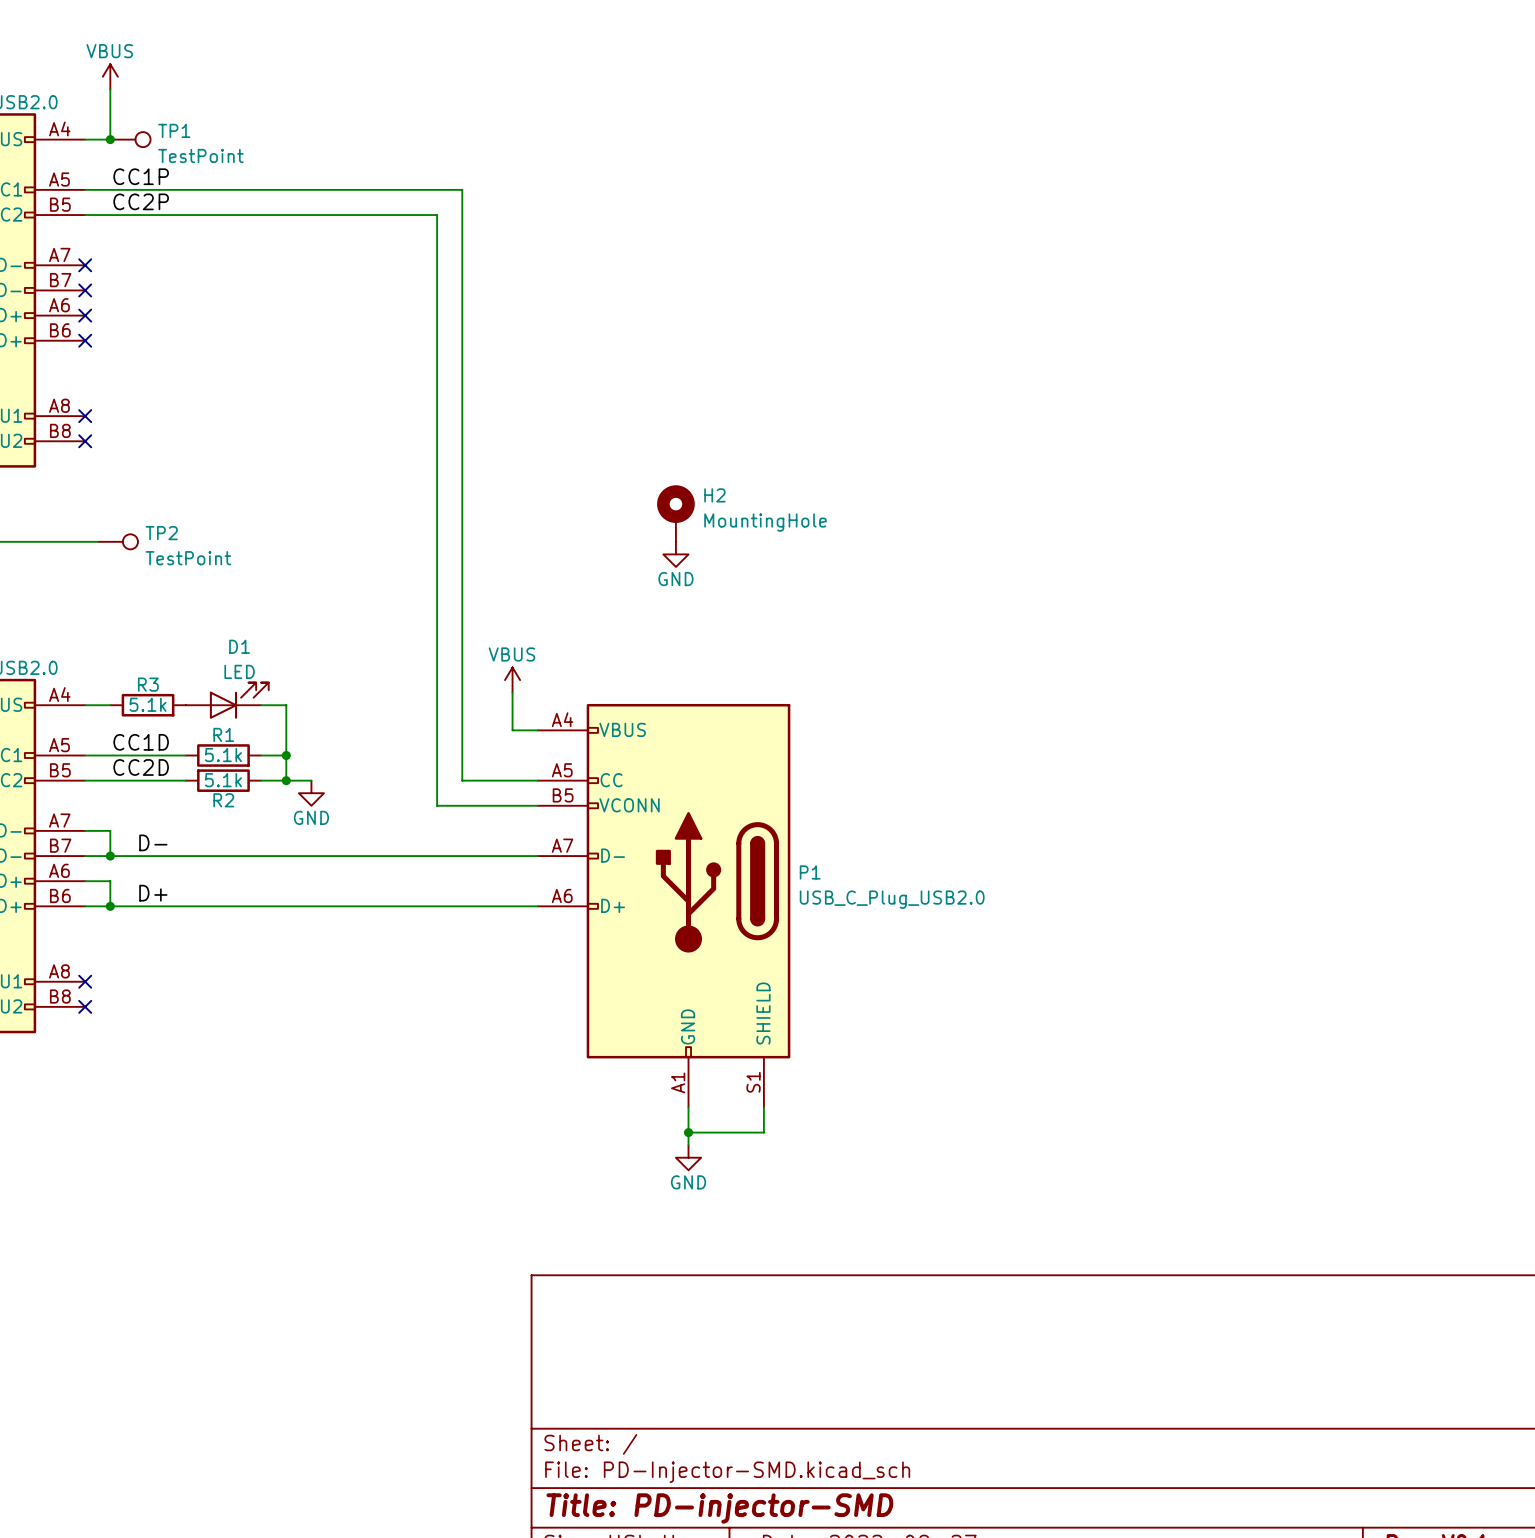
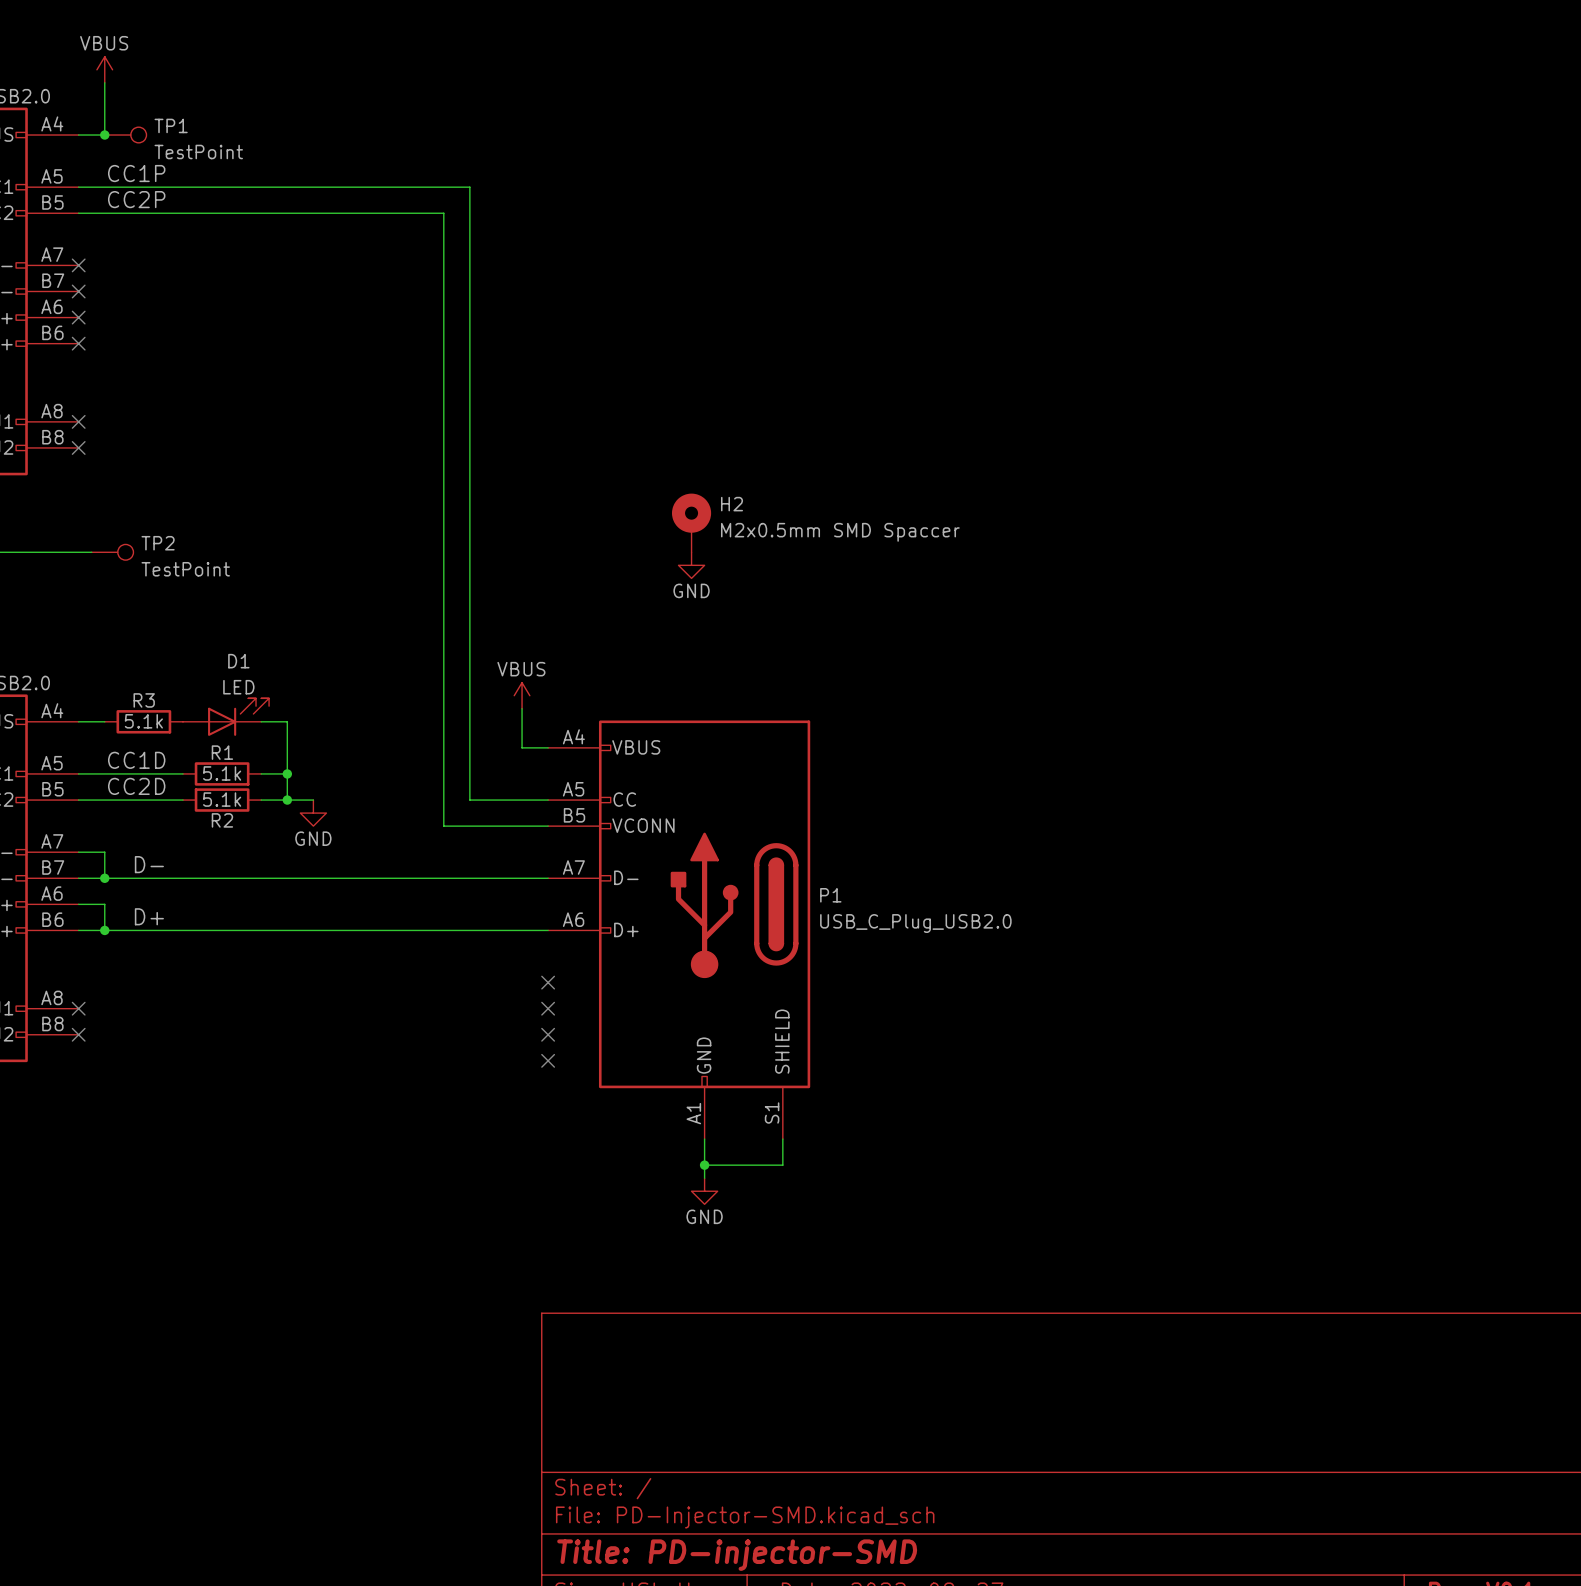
H2 value: MountingHole (765, 522) -> M2x0.5mm SMD Spaccer (840, 532)
no-connect mark: none -> (548, 982)
no-connect mark: none -> (548, 1008)
no-connect mark: none -> (548, 1034)
no-connect mark: none -> (548, 1060)

